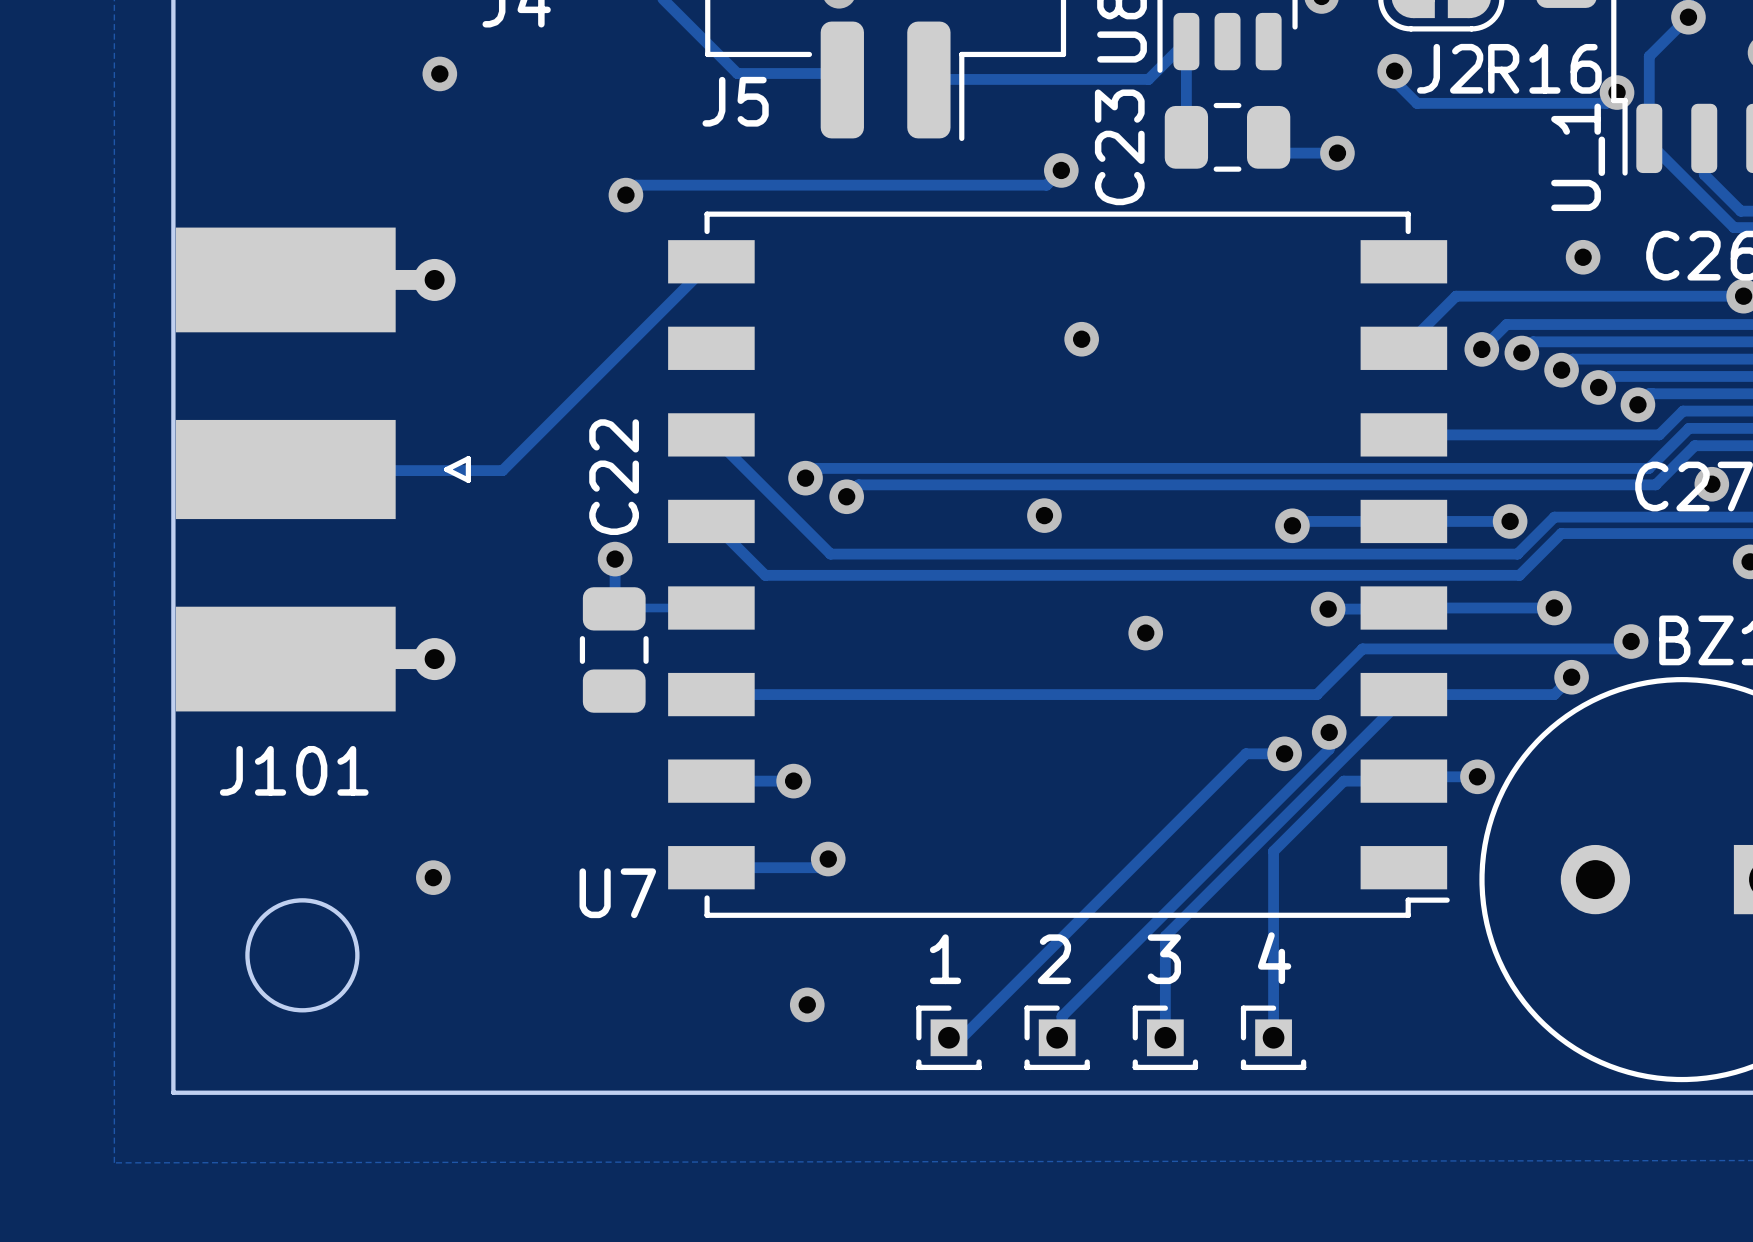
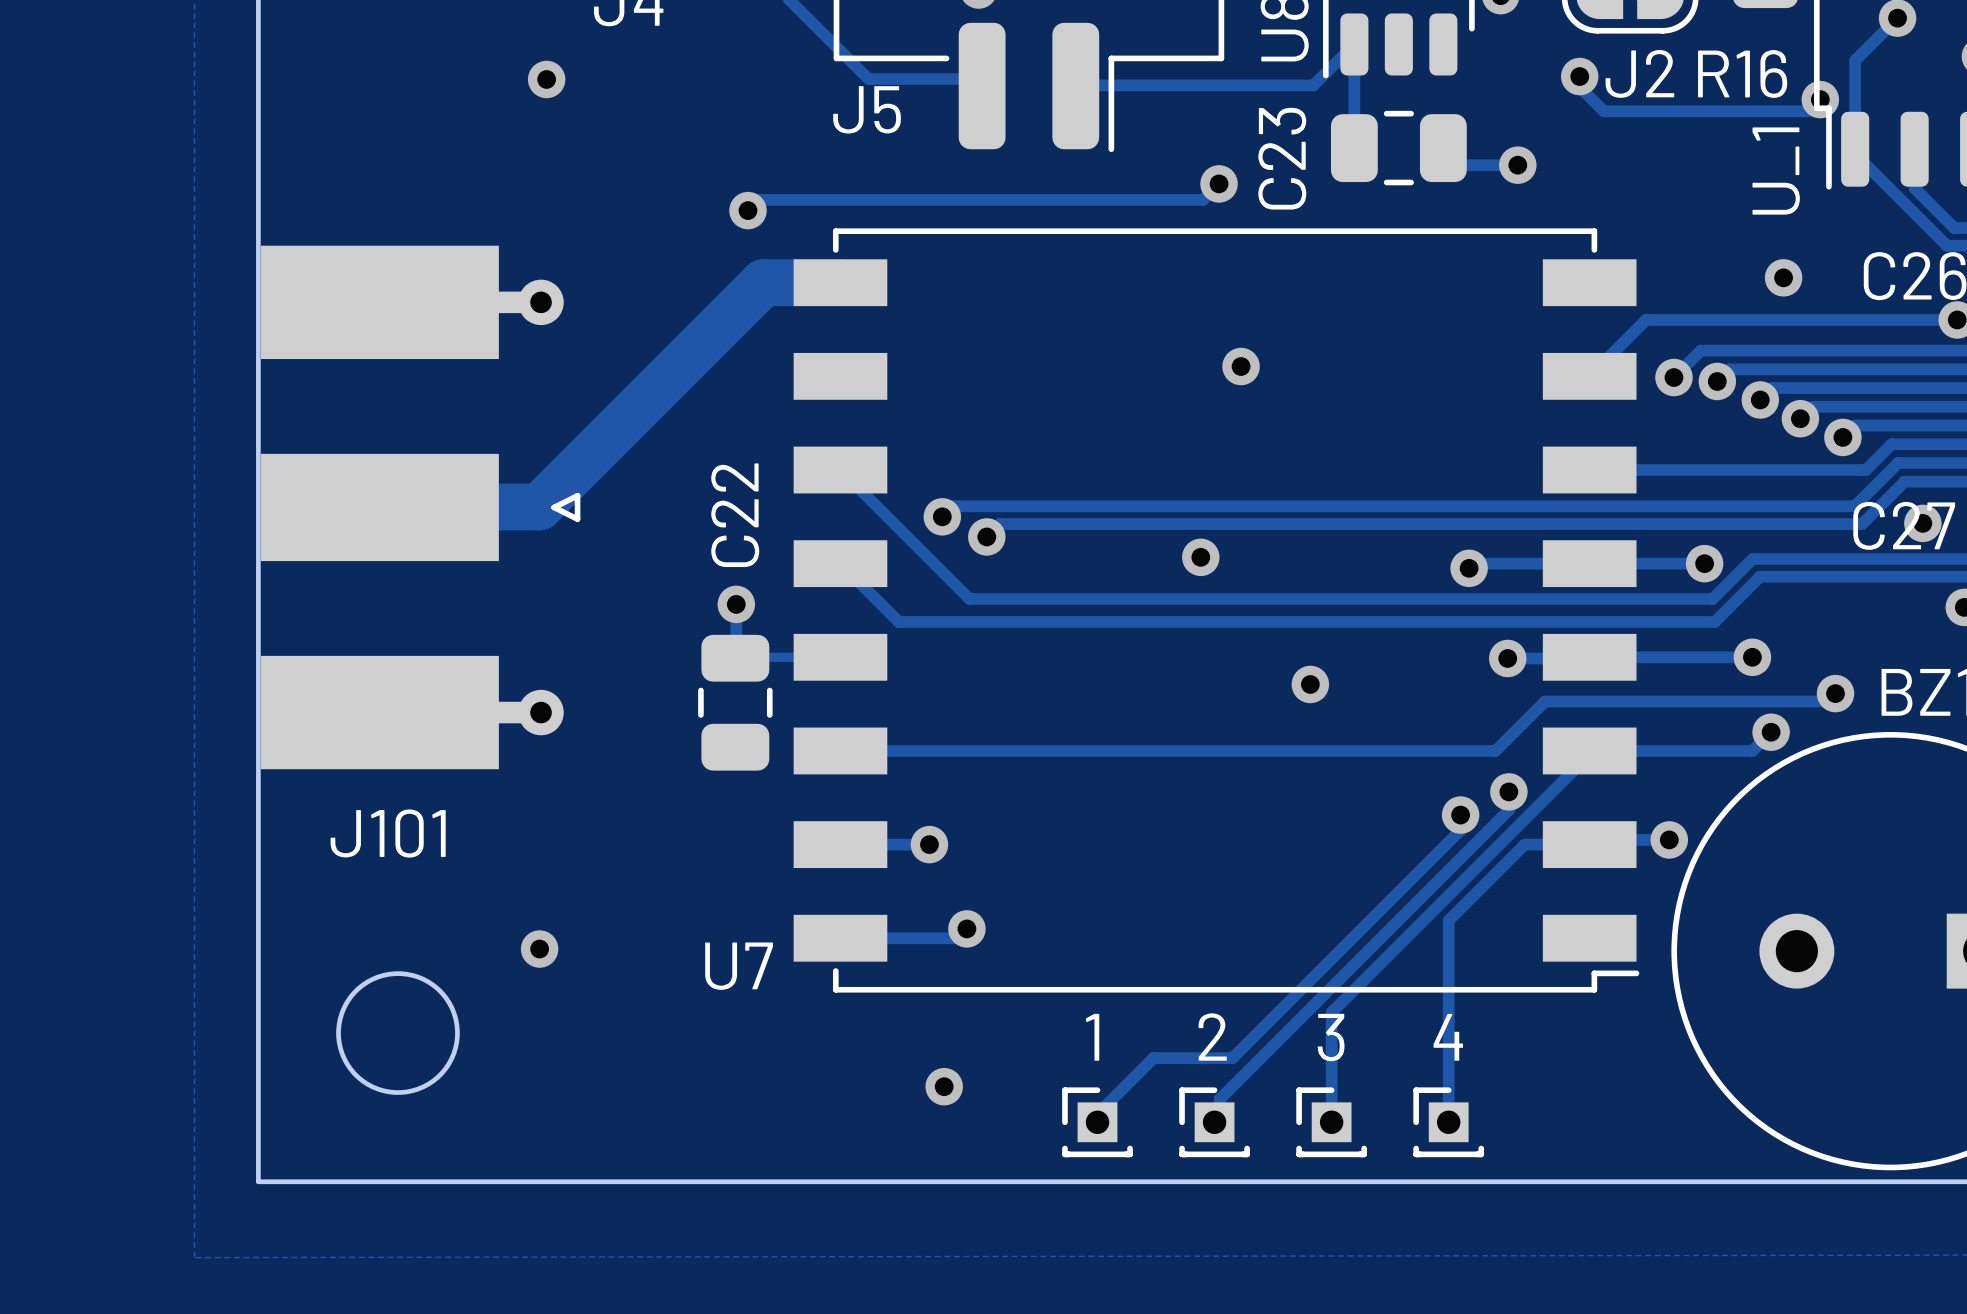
track: (711, 261) (502, 470) (255, 470) -> (840, 282) (763, 282) (539, 507) (380, 507)
track: (1284, 753) (1245, 753) (961, 1037) (948, 1037) -> (1460, 815) (1460, 830) (1232, 1058) (1153, 1058) (1097, 1114) (1097, 1122)

